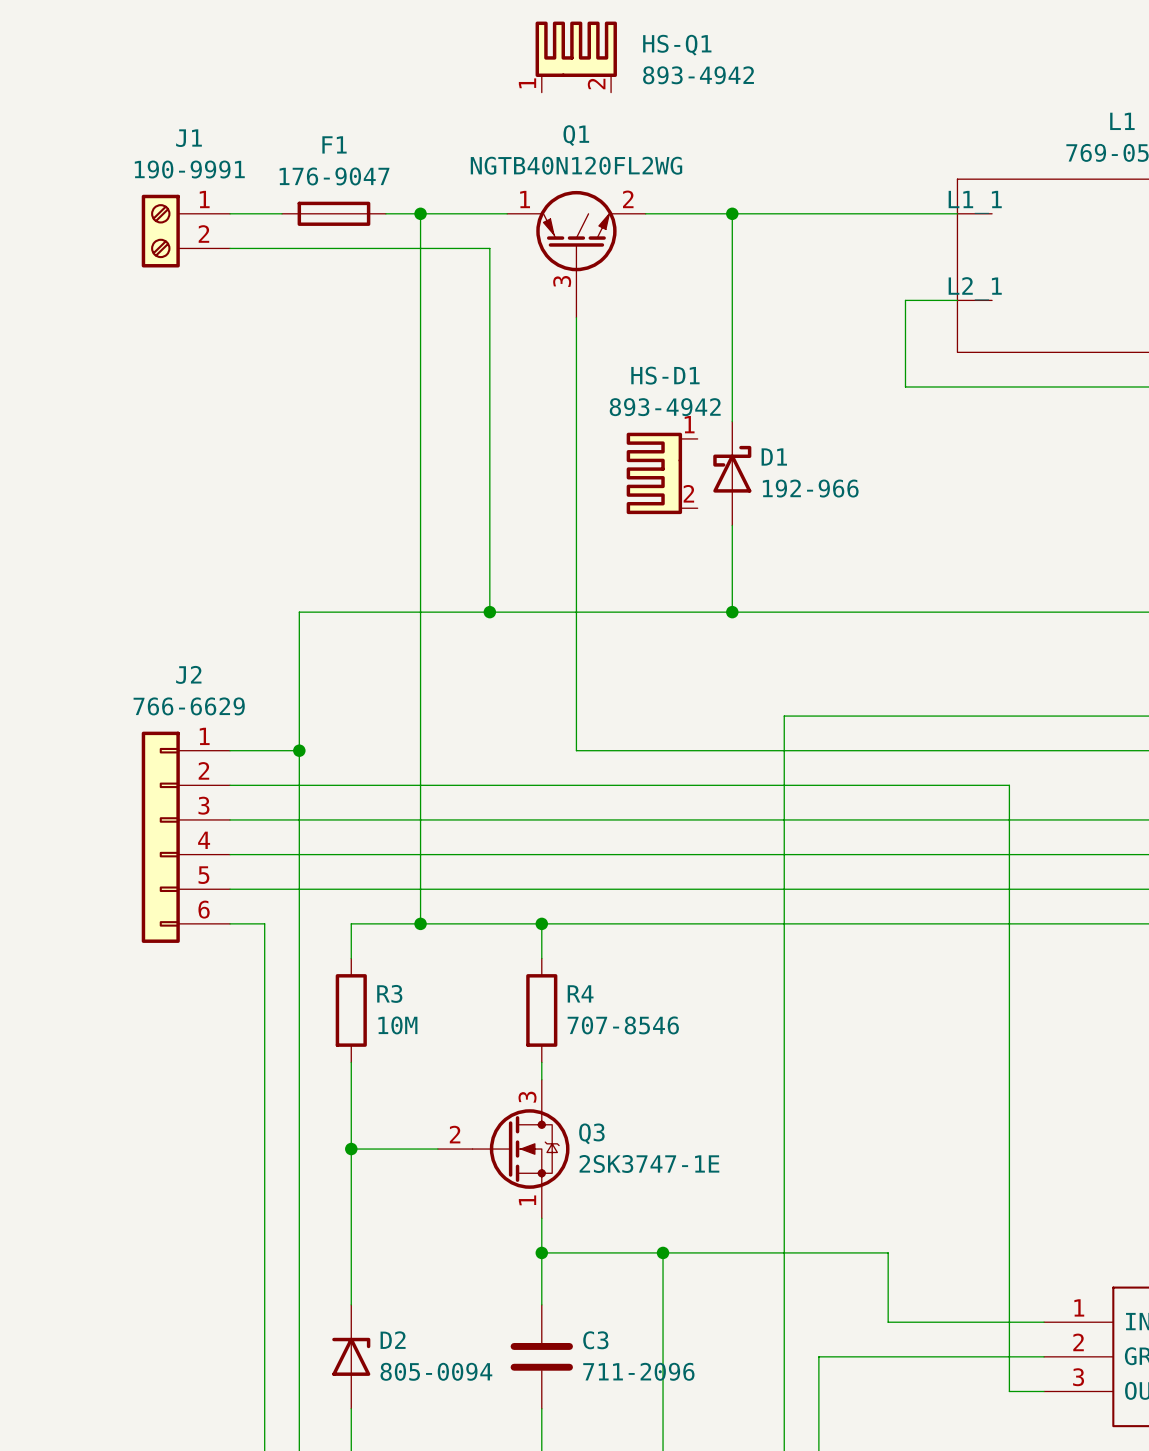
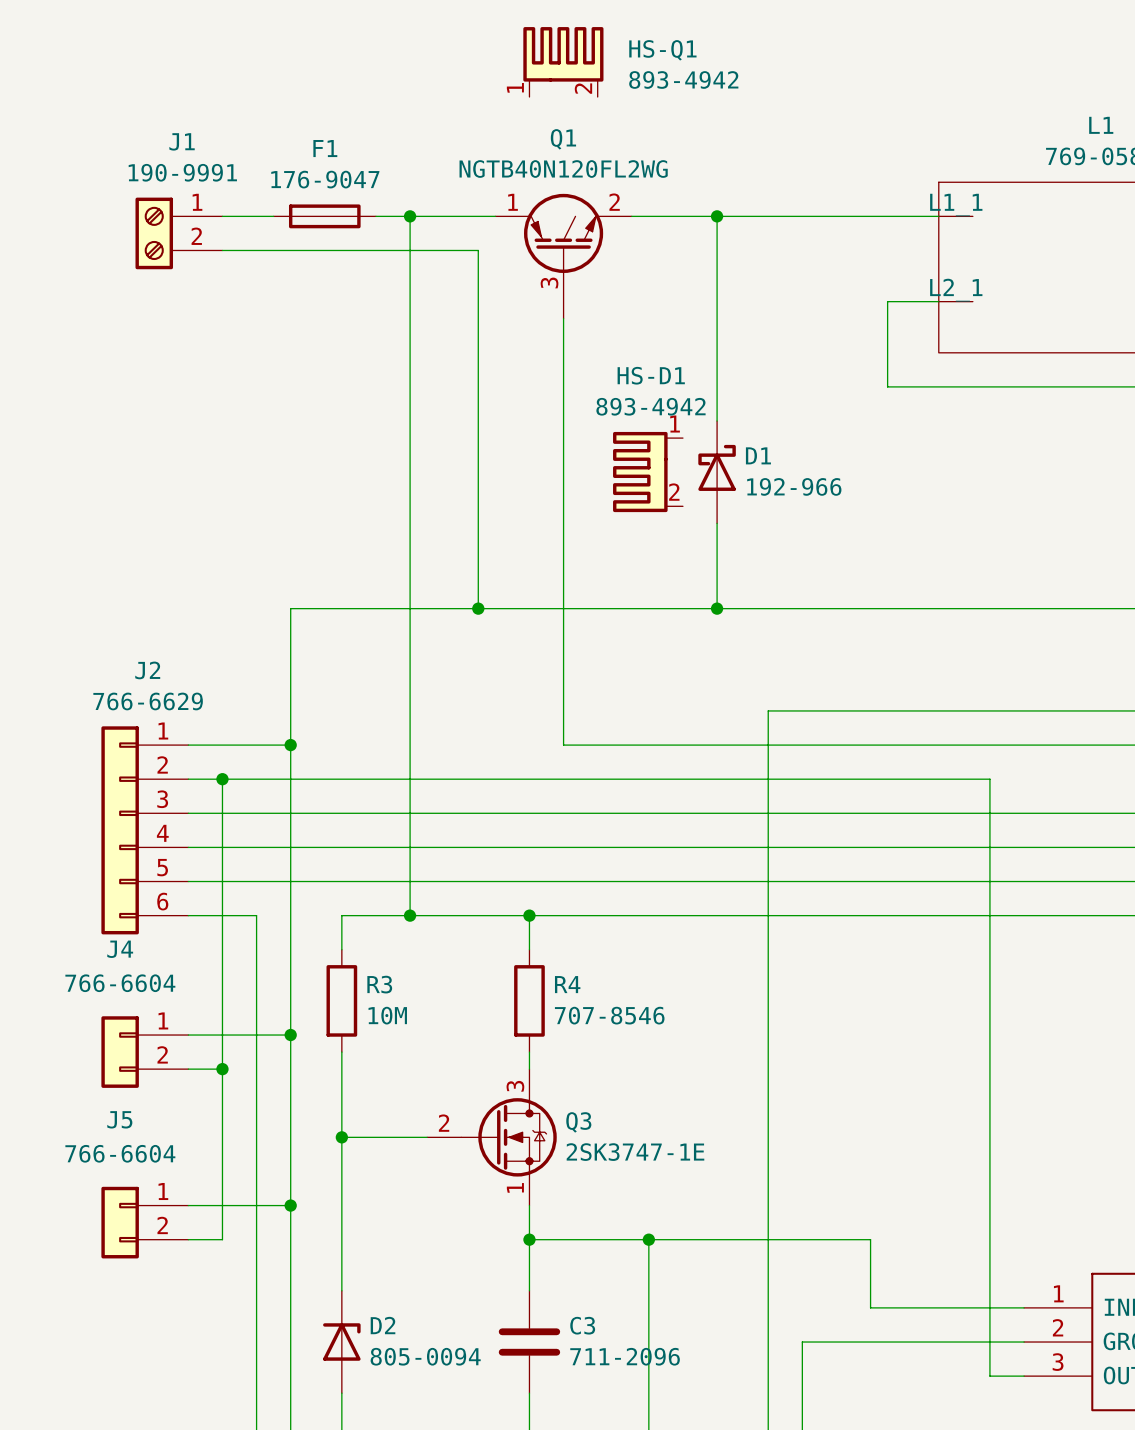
wire: none -> (188, 779) (222, 779) (222, 1239) (188, 1239)
junction: none -> (222, 779)
J2 position: (185, 837) -> (144, 830)
wire: none -> (188, 1035) (290, 1035)
junction: none -> (290, 1035)
J4: none -> 766-6604 (144, 1052)
wire: none -> (188, 1069) (222, 1069)
junction: none -> (222, 1069)
wire: none -> (188, 1205) (290, 1205)
junction: none -> (290, 1205)
J5: none -> 766-6604 (144, 1222)

